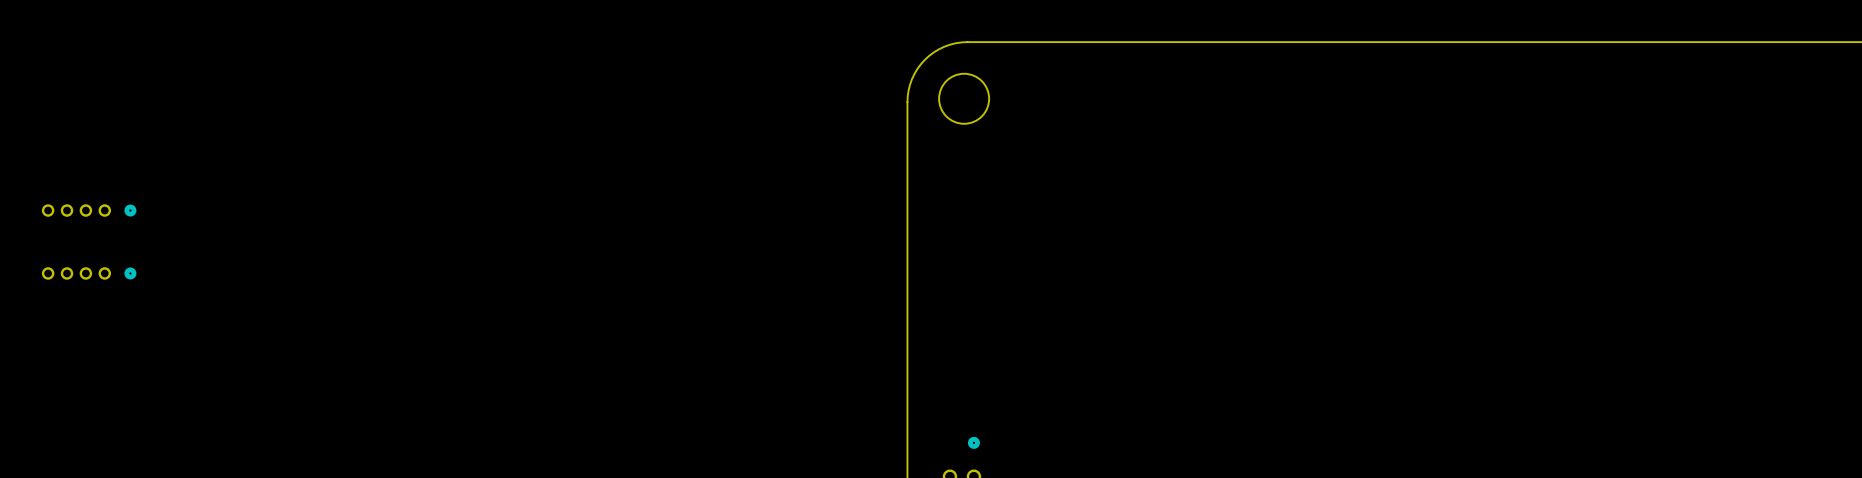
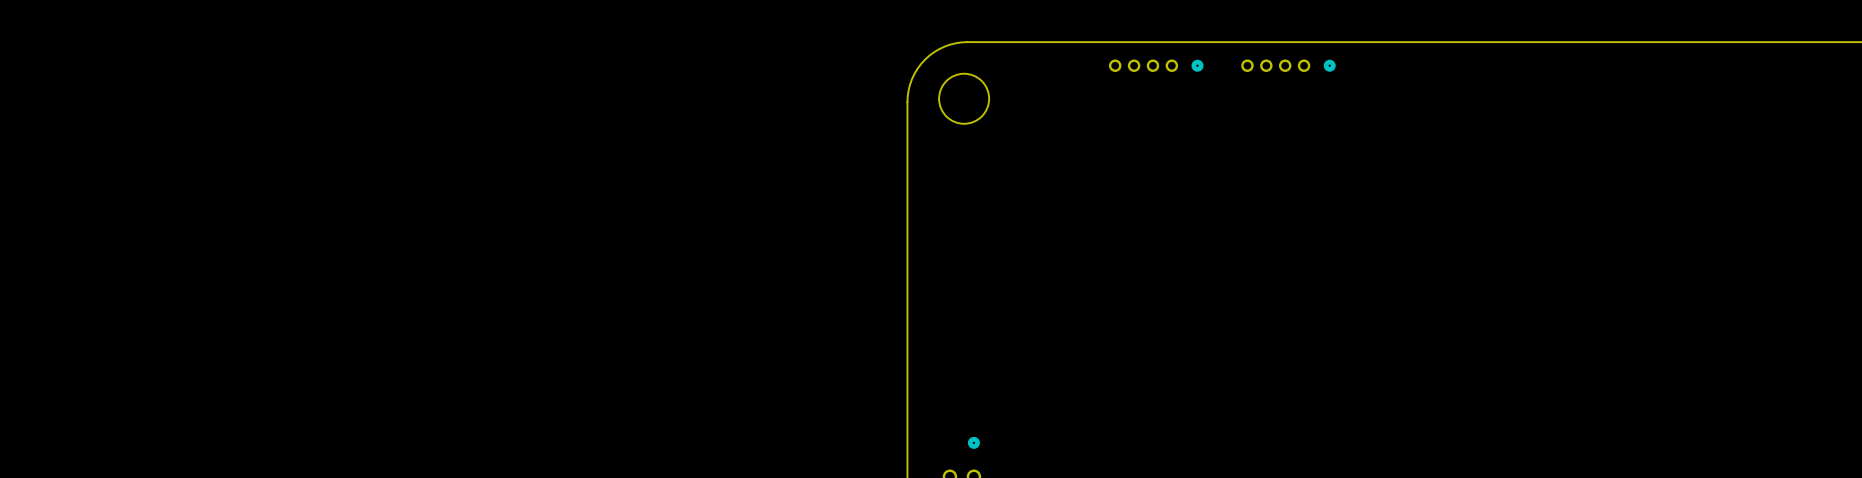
part: none -> (1156, 65)
part: none -> (1288, 65)
part: (89, 210) -> none
part: (89, 273) -> none

